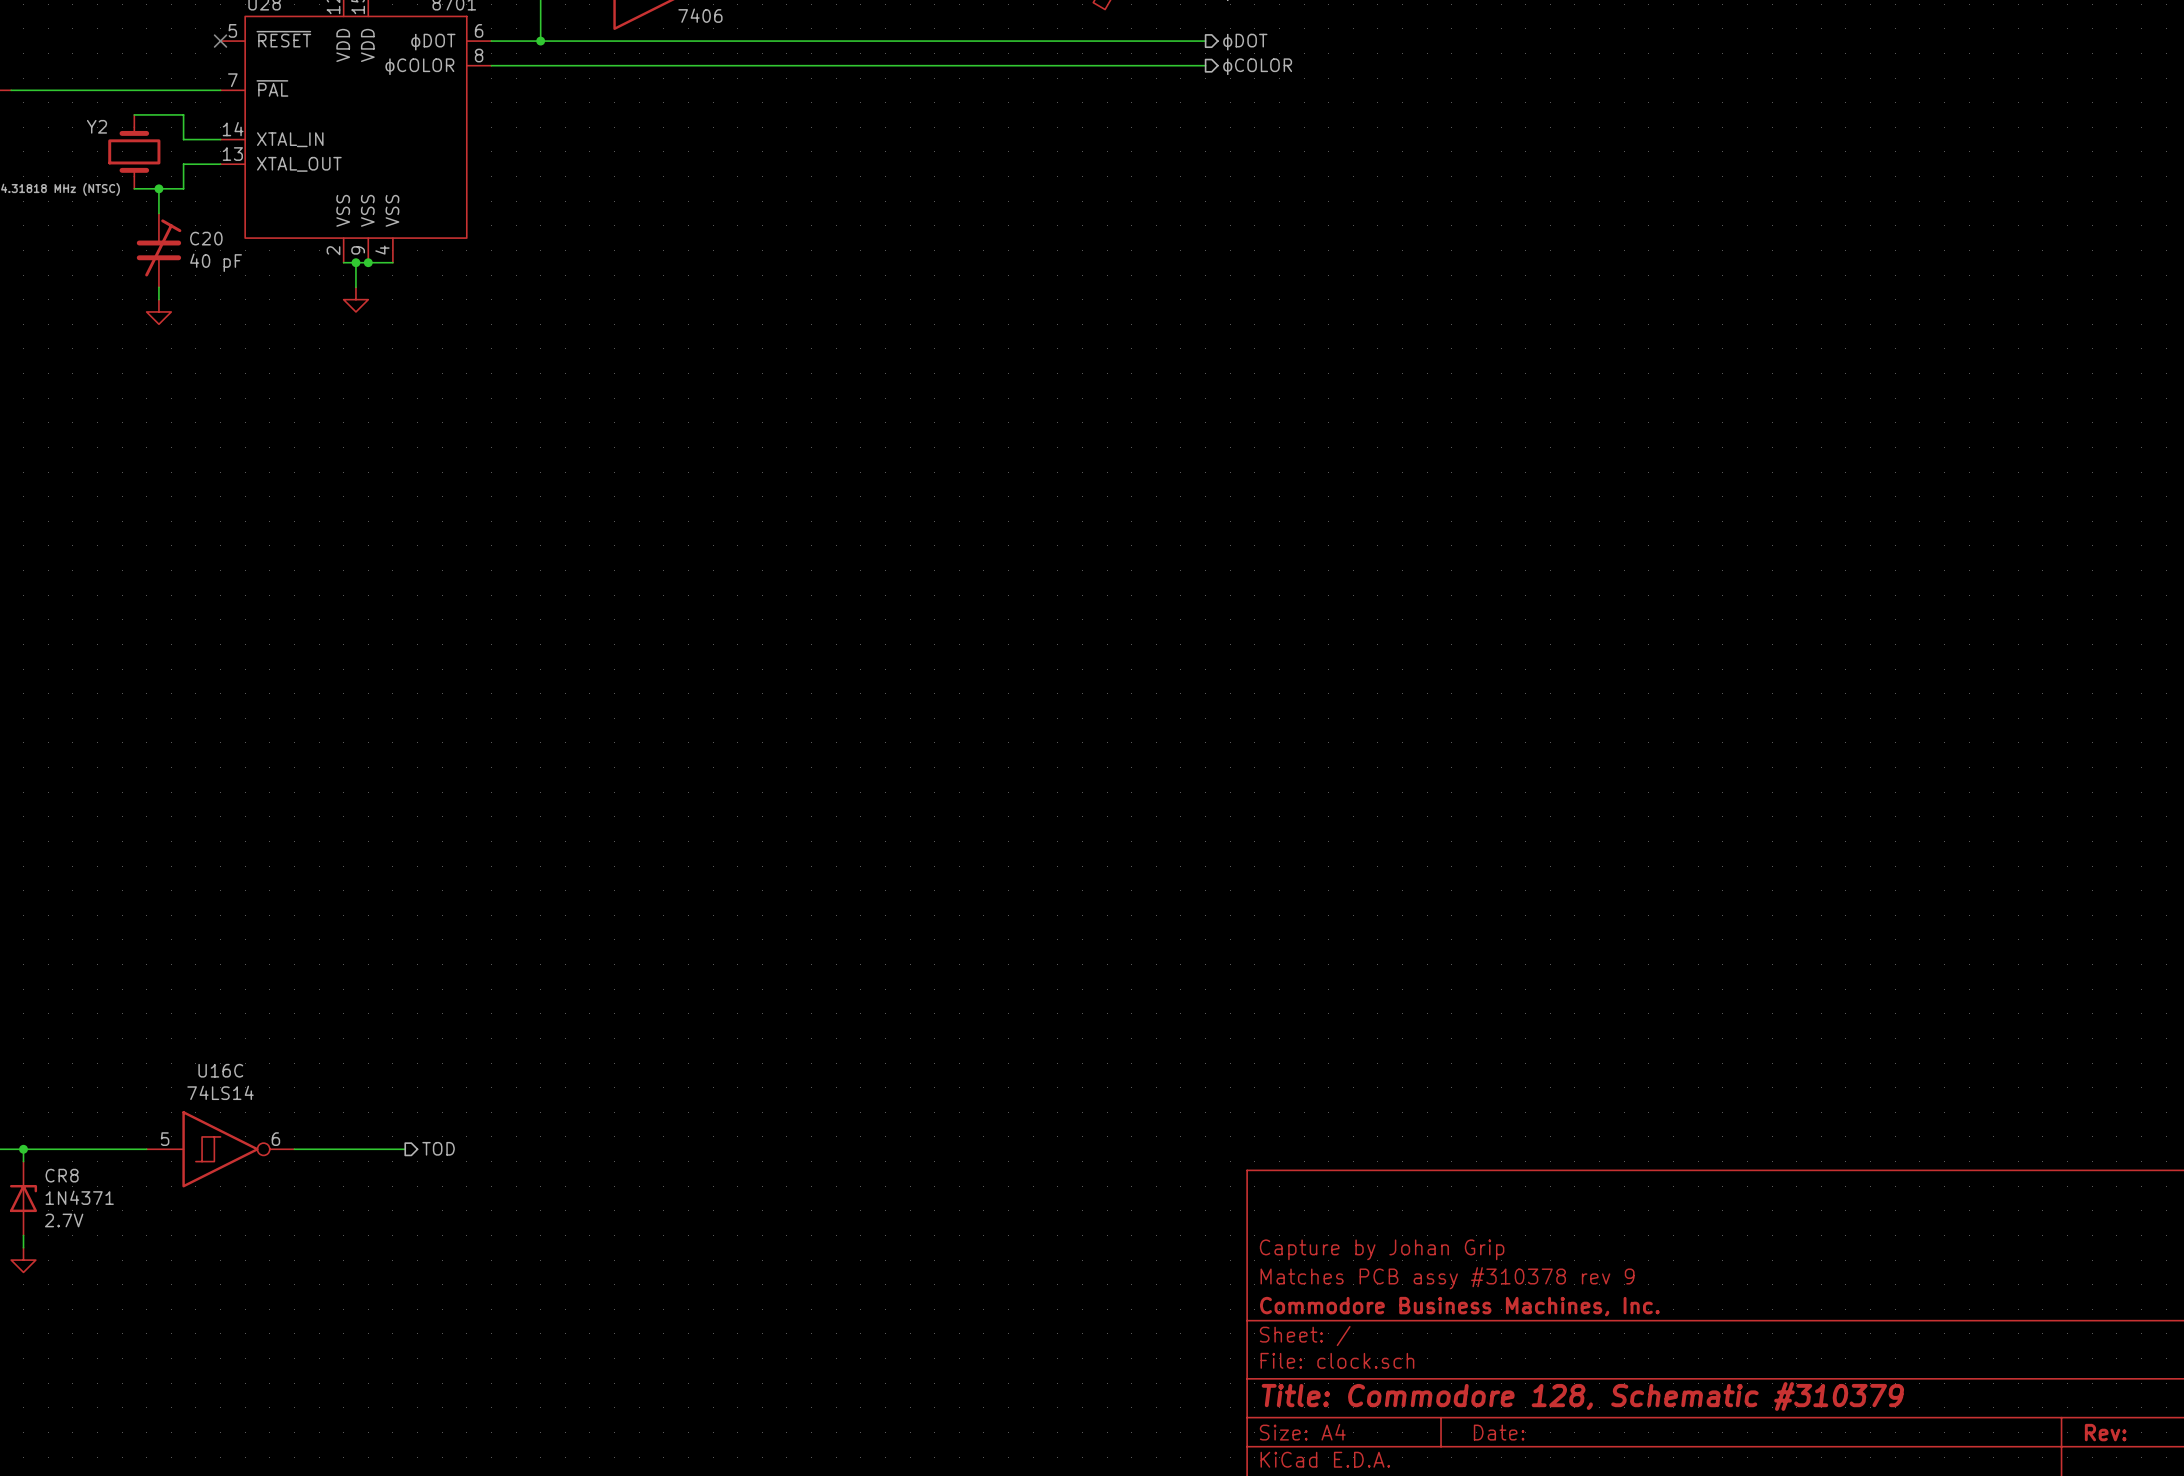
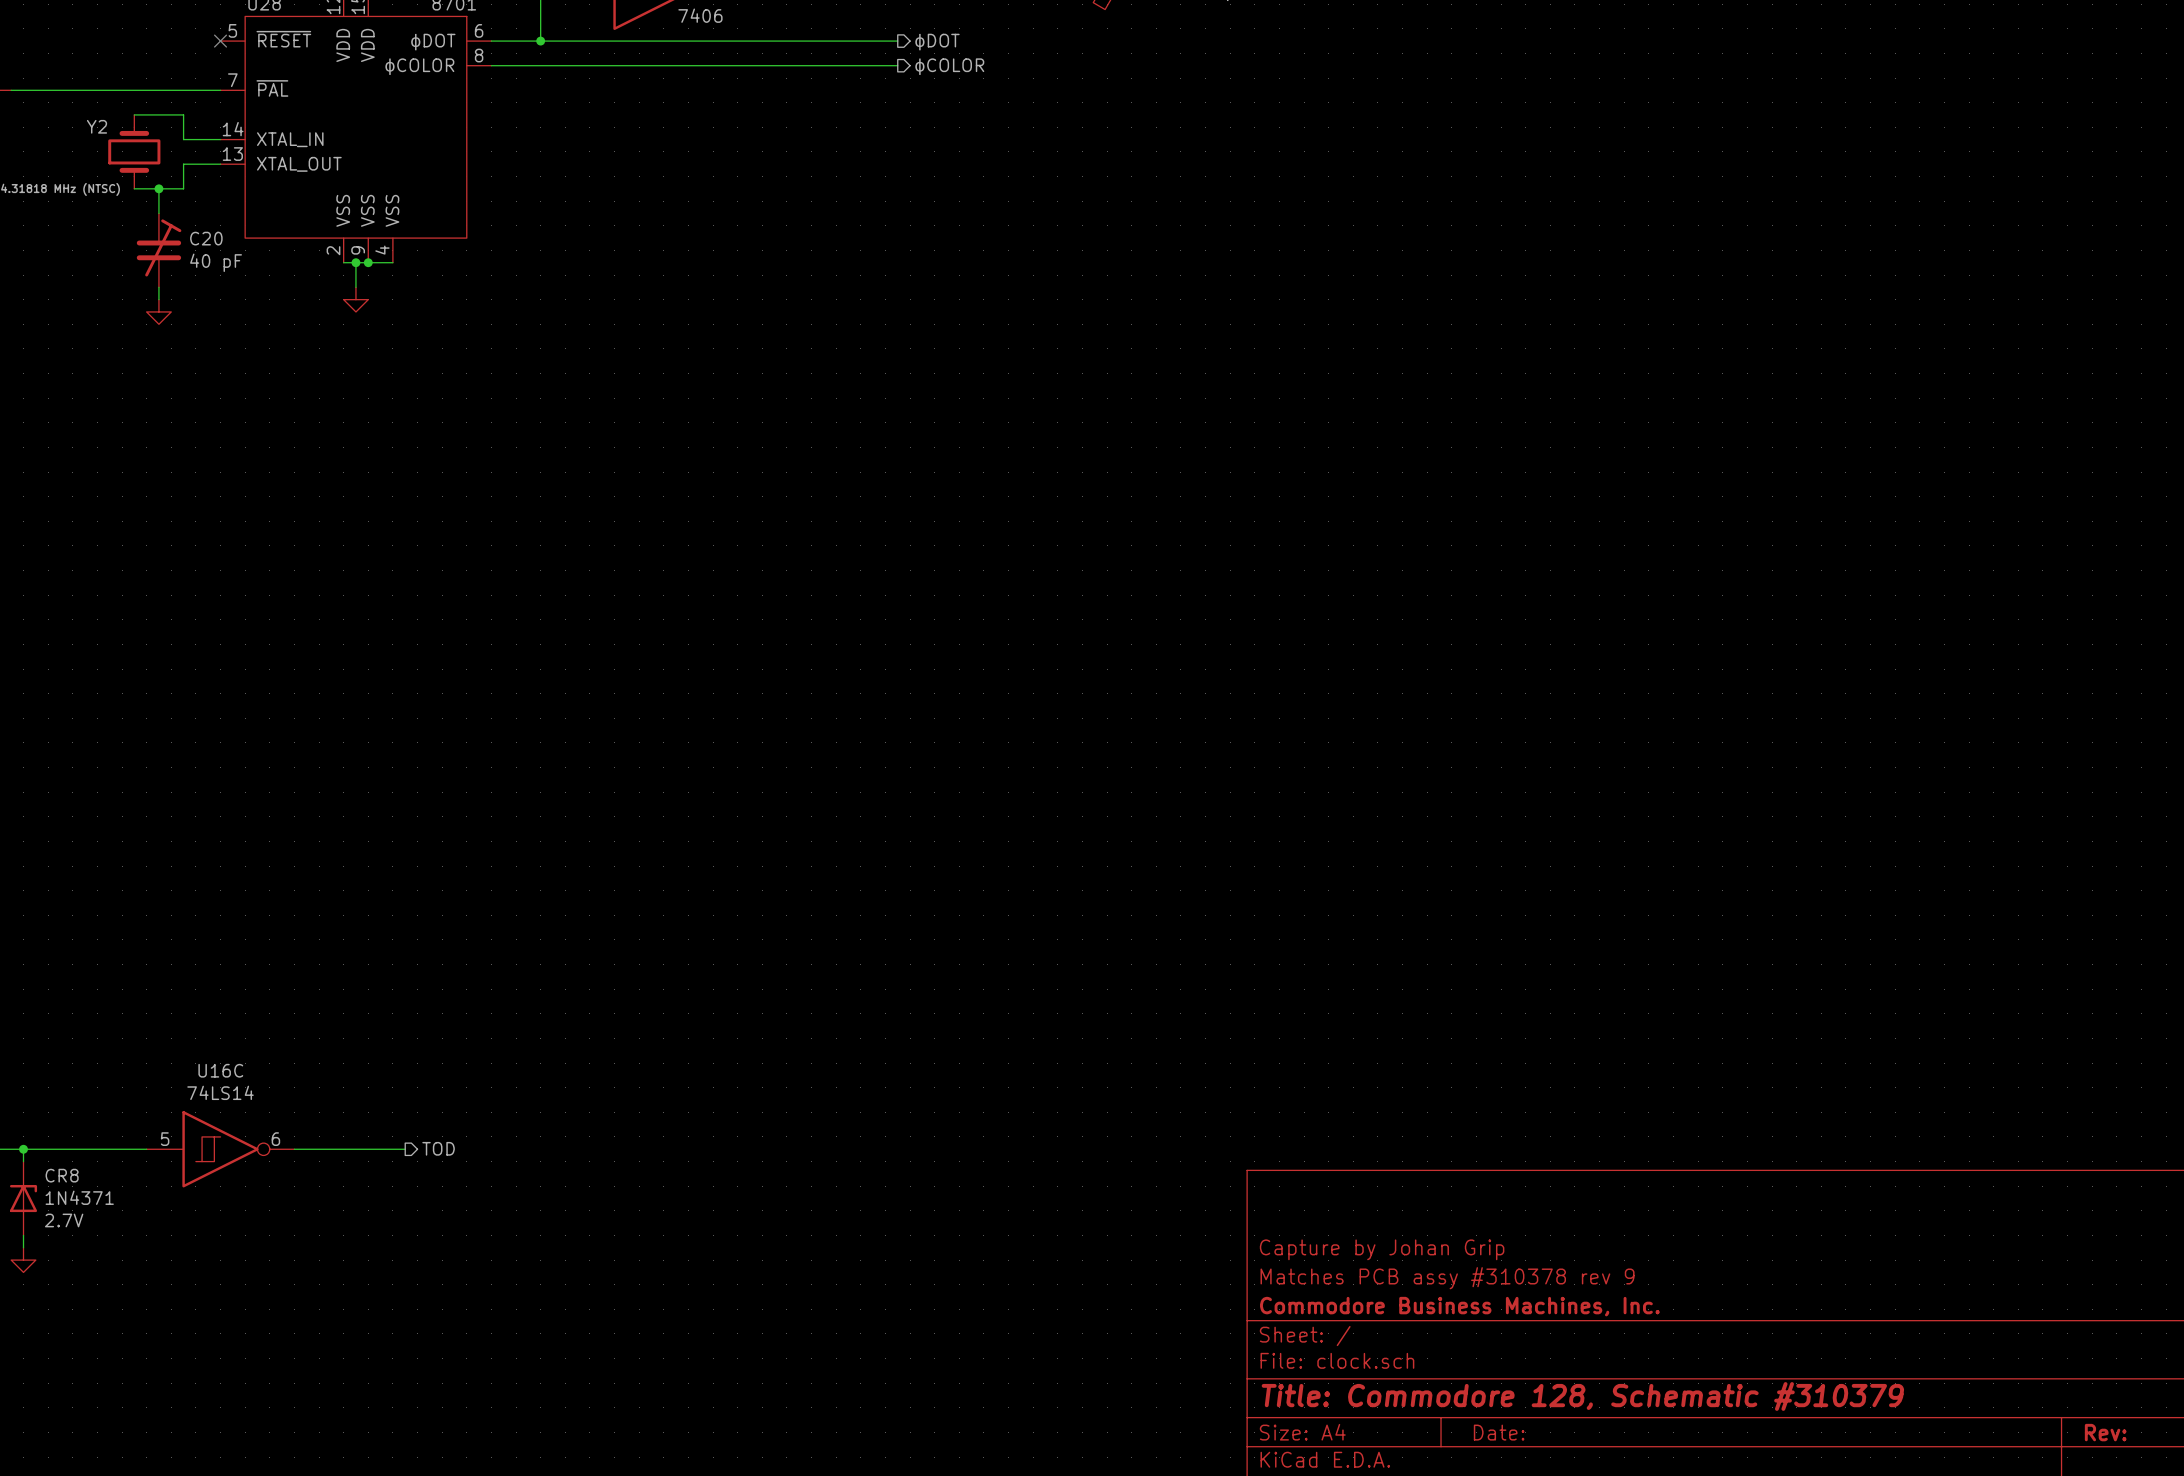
wire: (897, 41) (1205, 41) -> none
hierarchical label: none -> ϕDOT (937, 42)
hierarchical label: ϕDOT (1244, 42) -> none
wire: (897, 65) (1205, 65) -> none
hierarchical label: none -> ϕCOLOR (949, 66)
hierarchical label: ϕCOLOR (1257, 66) -> none

